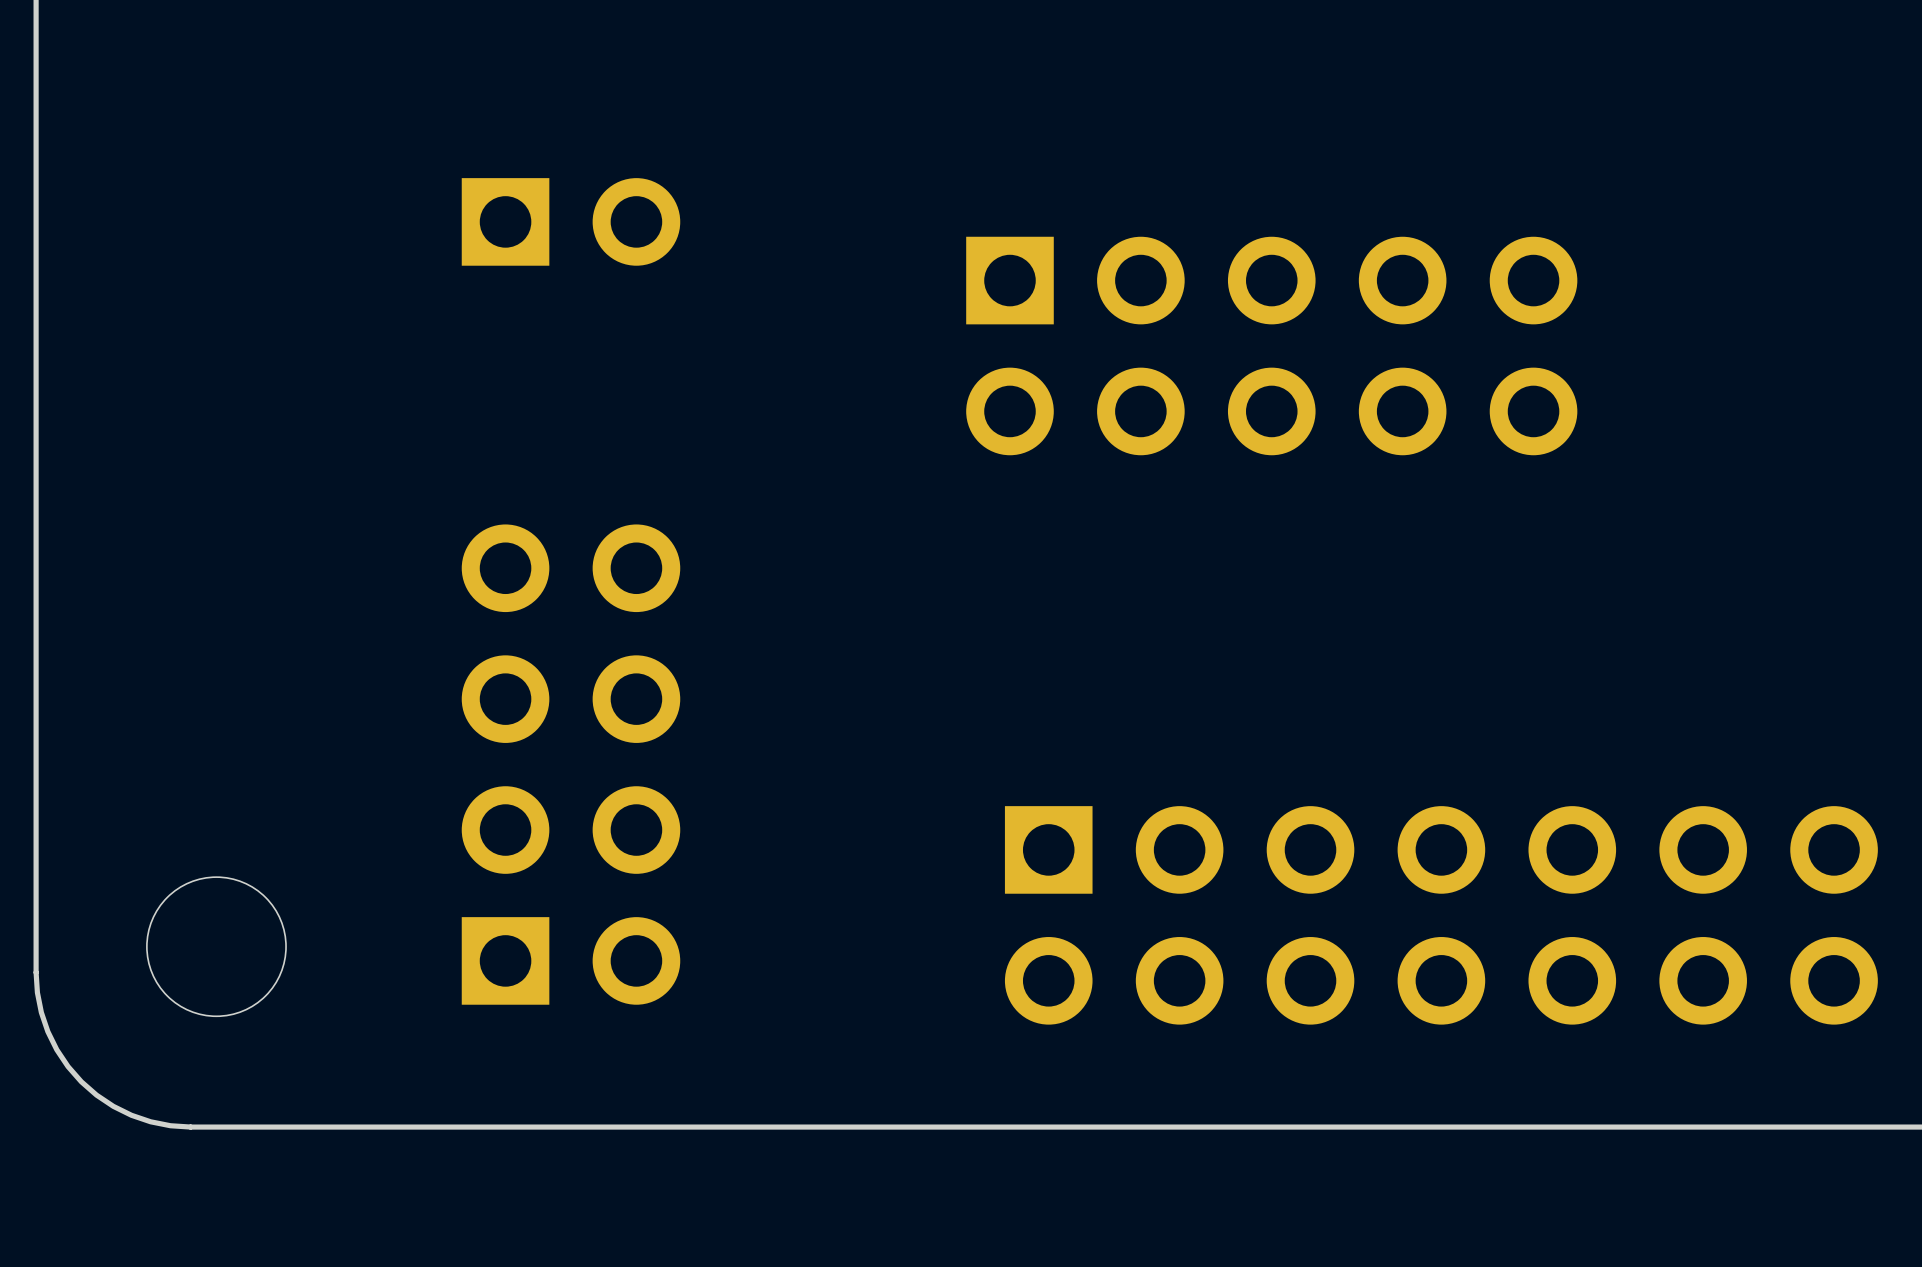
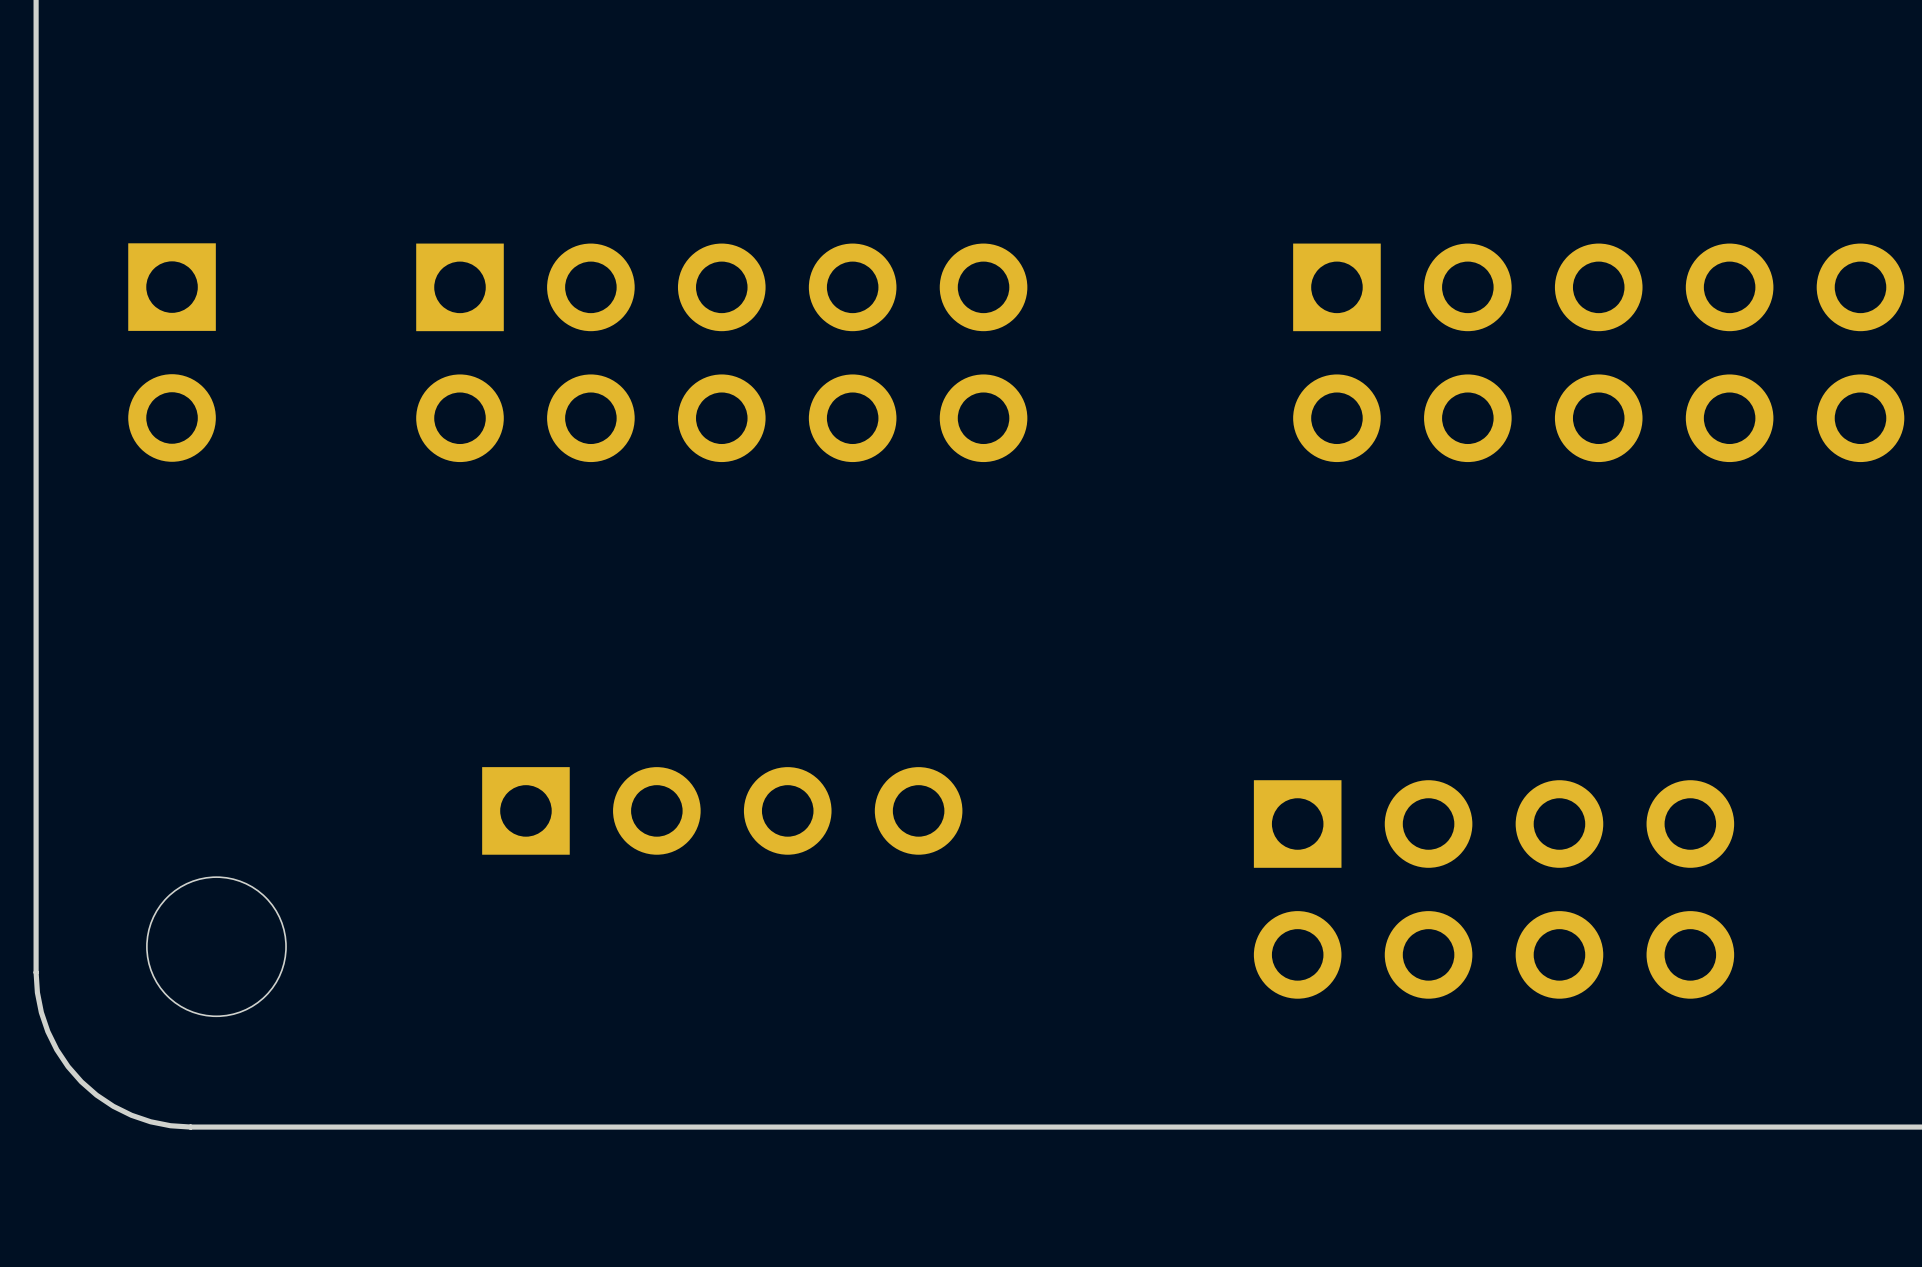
part rotation: 0° (570, 221) -> 90° clockwise (172, 352)
part position: (570, 221) -> (172, 352)
part: (1271, 346) -> none
part: none -> (721, 352)
part: none -> (1598, 352)
part rotation: 0° (570, 764) -> 90° clockwise (1494, 889)
part position: (570, 764) -> (1494, 889)
part: none -> (722, 810)
part: (1441, 915) -> none

